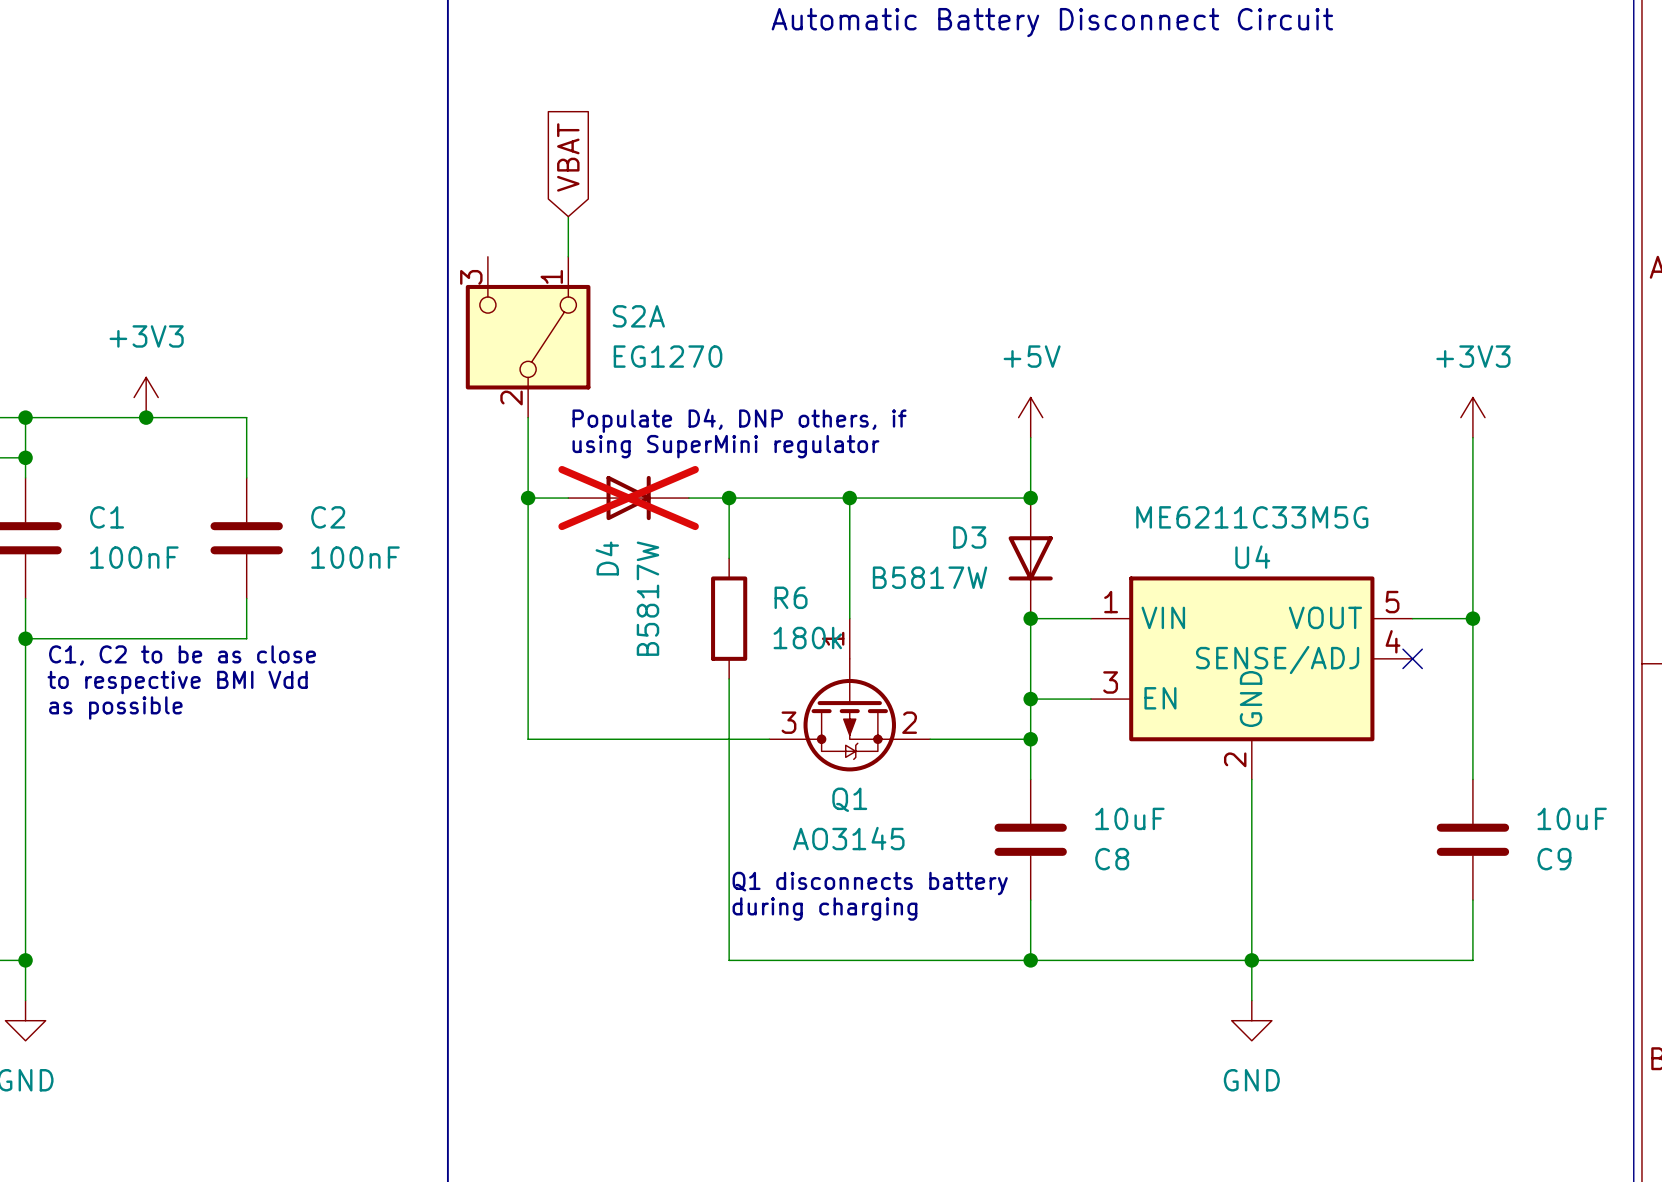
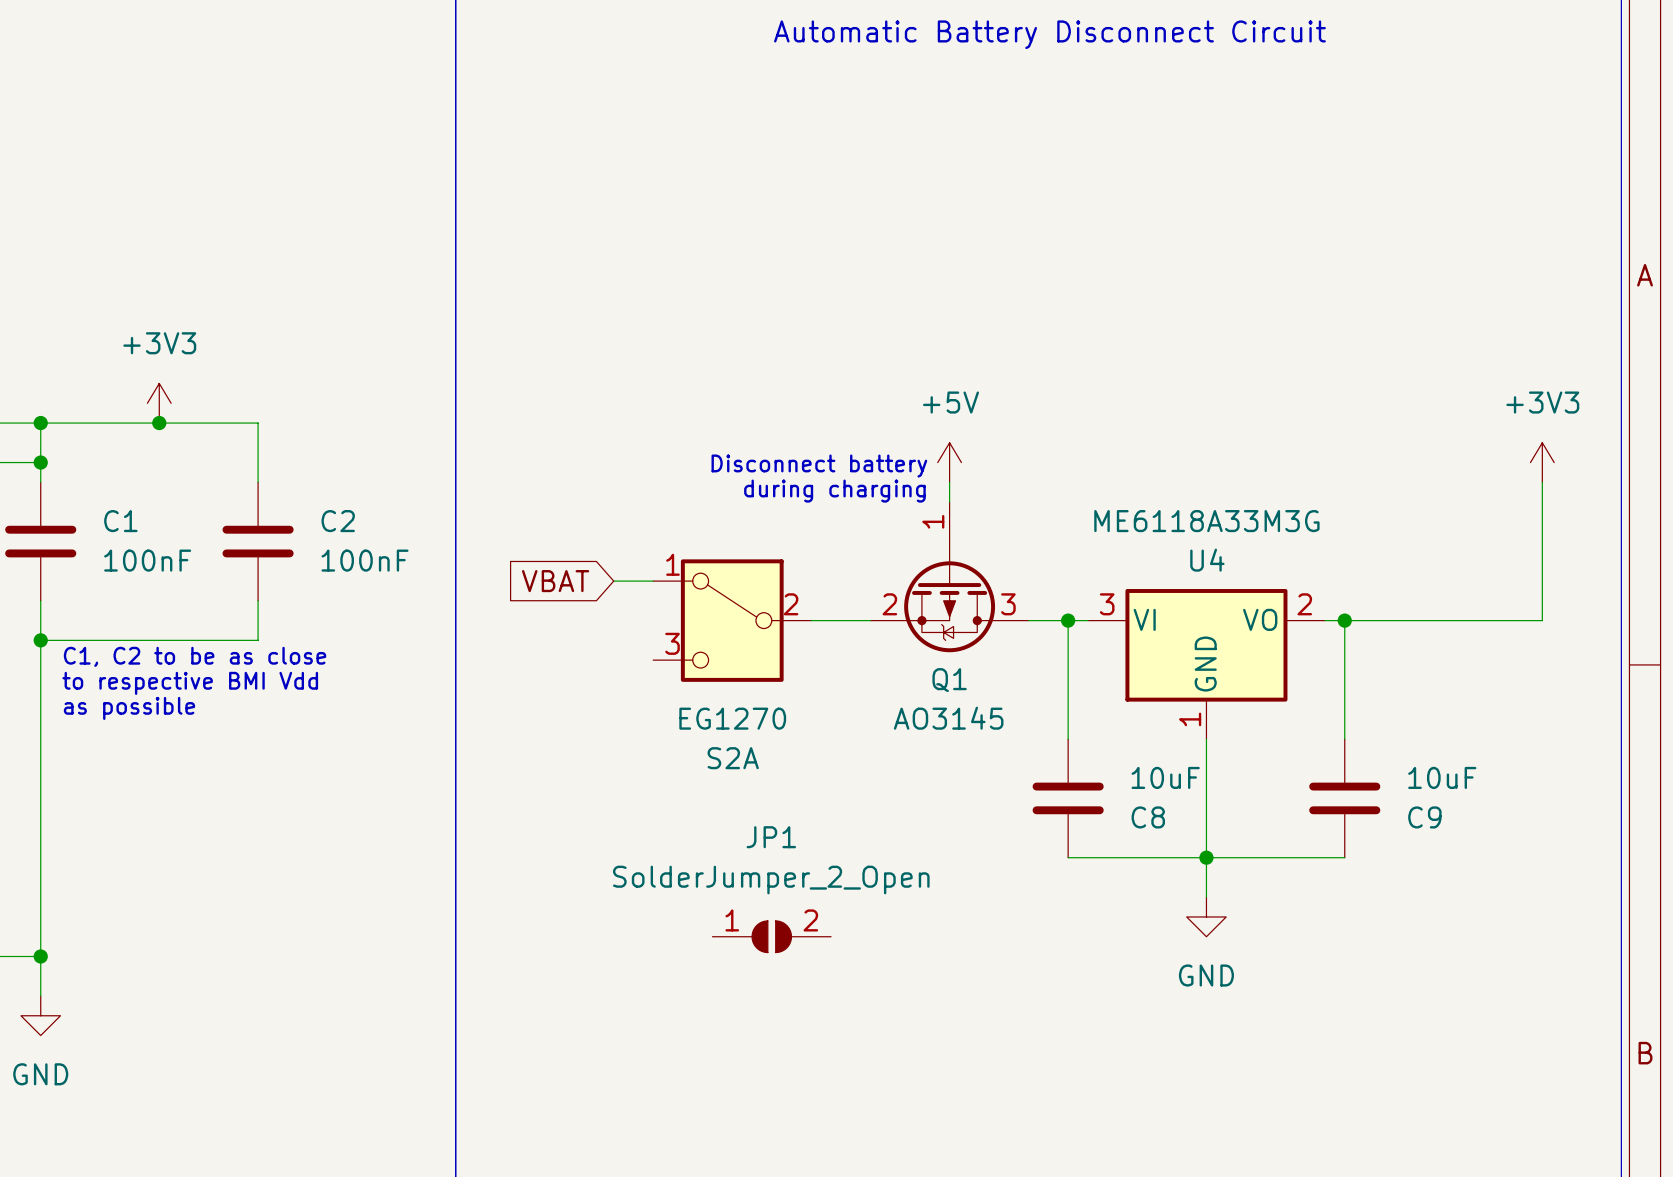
global label rotation: 0° (568, 157) -> 90° counterclockwise (555, 581)
global label position: VBAT (568, 157) -> VBAT (555, 581)
wire: (568, 216) (568, 256) -> none
S2A name position: S2A (638, 316) -> S2A (733, 758)
S2A rotation: 0° (528, 337) -> 90° counterclockwise (732, 620)
S2A position: (528, 337) -> (732, 620)
S2A value position: EG1270 (668, 356) -> EG1270 (732, 718)
wire: (528, 417) (528, 739) (769, 739) -> none
power symbol position: +5V (1030, 417) -> +5V (949, 462)
power symbol position: +3V3 (1472, 417) -> +3V3 (1542, 462)
text: Populate D4, DNP others, if (739, 420) -> none
wire: (1030, 437) (1030, 498) (688, 498) -> none
wire: (1472, 437) (1472, 779) -> none
text: using SuperMini regulator (725, 446) -> none
text: none -> Disconnect battery (819, 466)
wire: none -> (949, 482) (949, 502)
wire: none -> (1542, 482) (1542, 620) (1463, 620)
text: none -> during charging (834, 491)
wire: (528, 498) (568, 498) -> (613, 581) (653, 581)
junction: (528, 498) -> none
D4: B5817W (628, 498) -> none
wire: (729, 498) (729, 558) -> none
junction: (729, 498) -> none
wire: (849, 498) (849, 618) -> (1068, 620) (1068, 739)
junction: (849, 498) -> none
junction: (1030, 498) -> none
U4 value: ME6211C33M5G (1252, 517) -> ME6118A33M3G (1206, 521)
D3: B5817W (1030, 558) -> none
U4 symbol: [1090, 576, 1413, 780] -> [1087, 589, 1326, 740]
R6: 180k (729, 618) -> none
wire: (1030, 618) (1030, 779) -> (1206, 739) (1206, 897)
junction position: (1030, 618) -> (1068, 620)
junction: none -> (1344, 620)
junction: (1472, 618) -> none
no-connect mark: (1412, 658) -> none
wire: (729, 678) (729, 960) (1472, 960) (1472, 900) -> none
Q1 position: (849, 695) -> (949, 577)
wire: (1030, 699) (1090, 699) -> (811, 620) (870, 620)
junction: (1030, 699) -> none
Q1 flip: as is (849, 715) -> left-right (949, 596)
wire: (930, 739) (1030, 739) -> none
junction: (1030, 739) -> none
wire: (1251, 779) (1251, 1000) -> none
C8 position: (1030, 839) -> (1068, 798)
C9 position: (1472, 839) -> (1344, 798)
wire: none -> (1068, 857) (1344, 857)
junction: none -> (1206, 857)
text: Q1 disconnects battery (870, 883) -> none
wire: (1030, 900) (1030, 960) -> none
text: during charging (824, 909) -> none
JP1: none -> SolderJumper_2_Open (771, 936)
junction: (1030, 960) -> none
junction: (1251, 960) -> none
power symbol position: GND (1251, 1020) -> GND (1206, 916)

